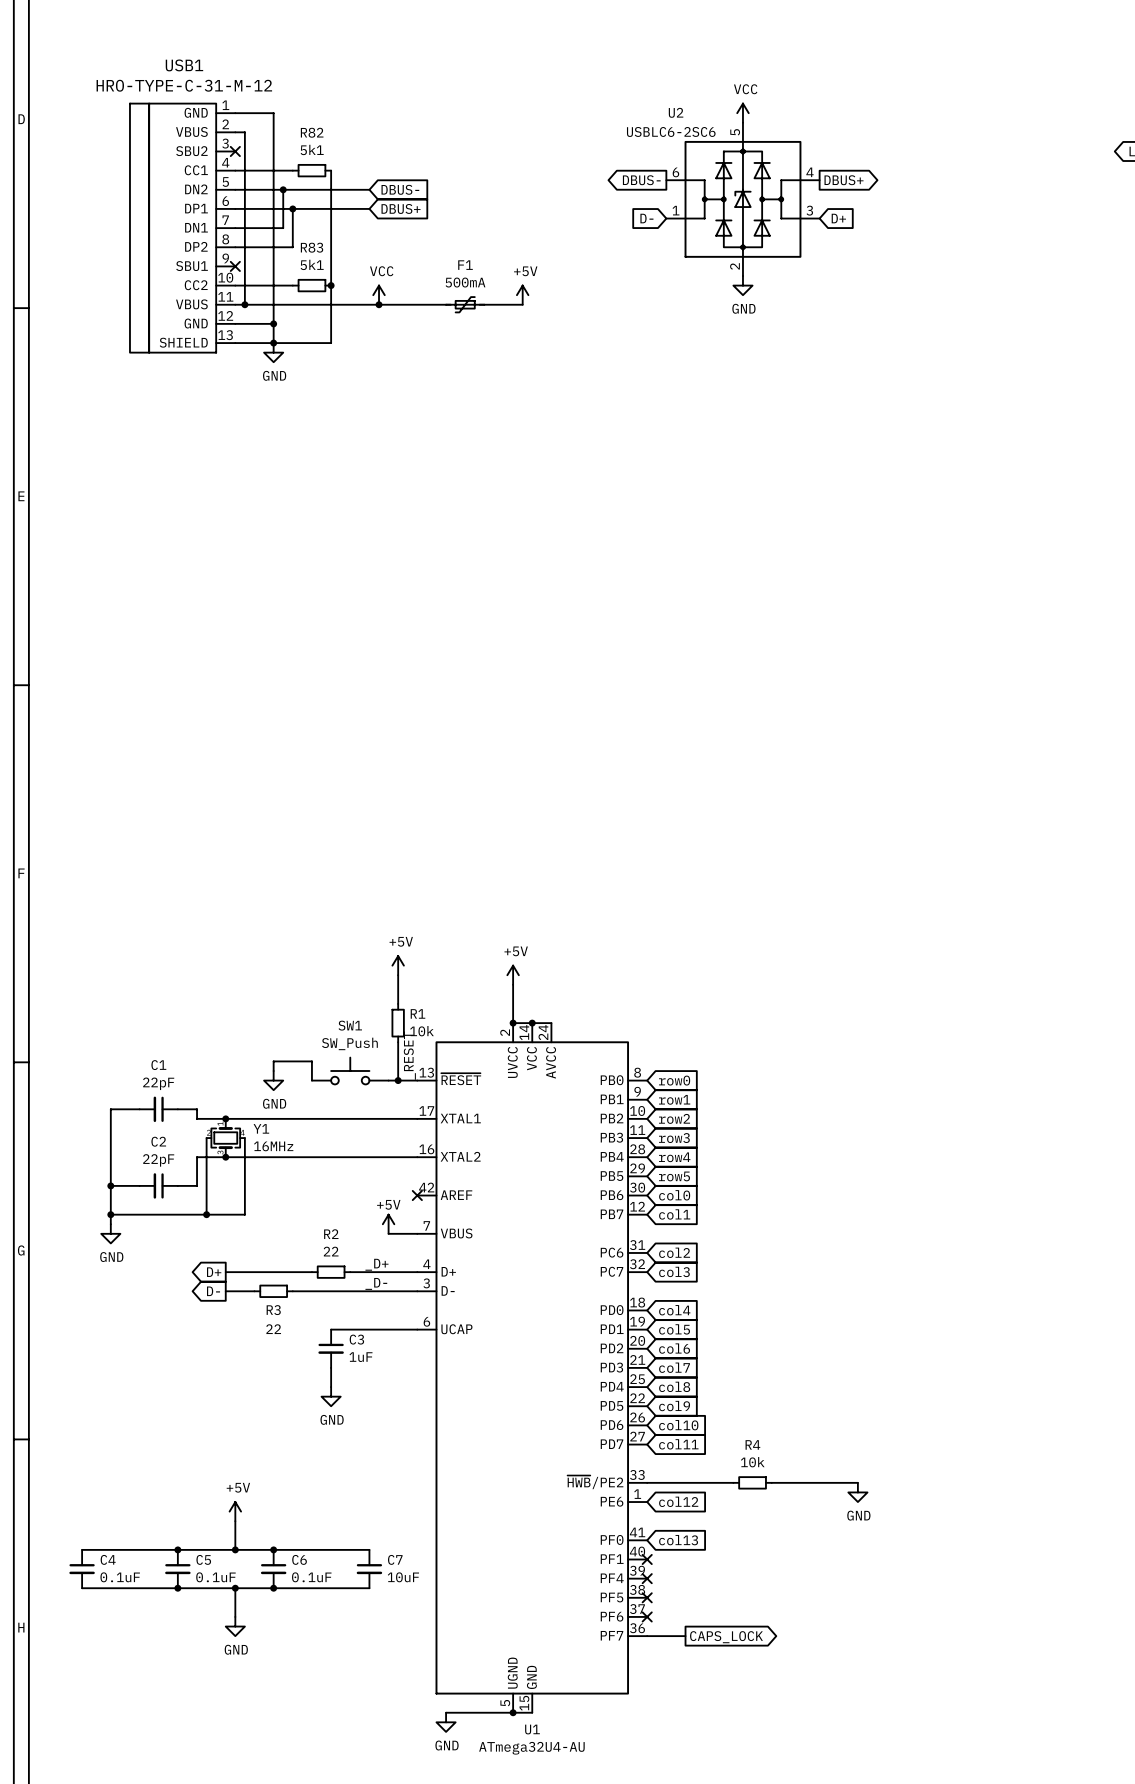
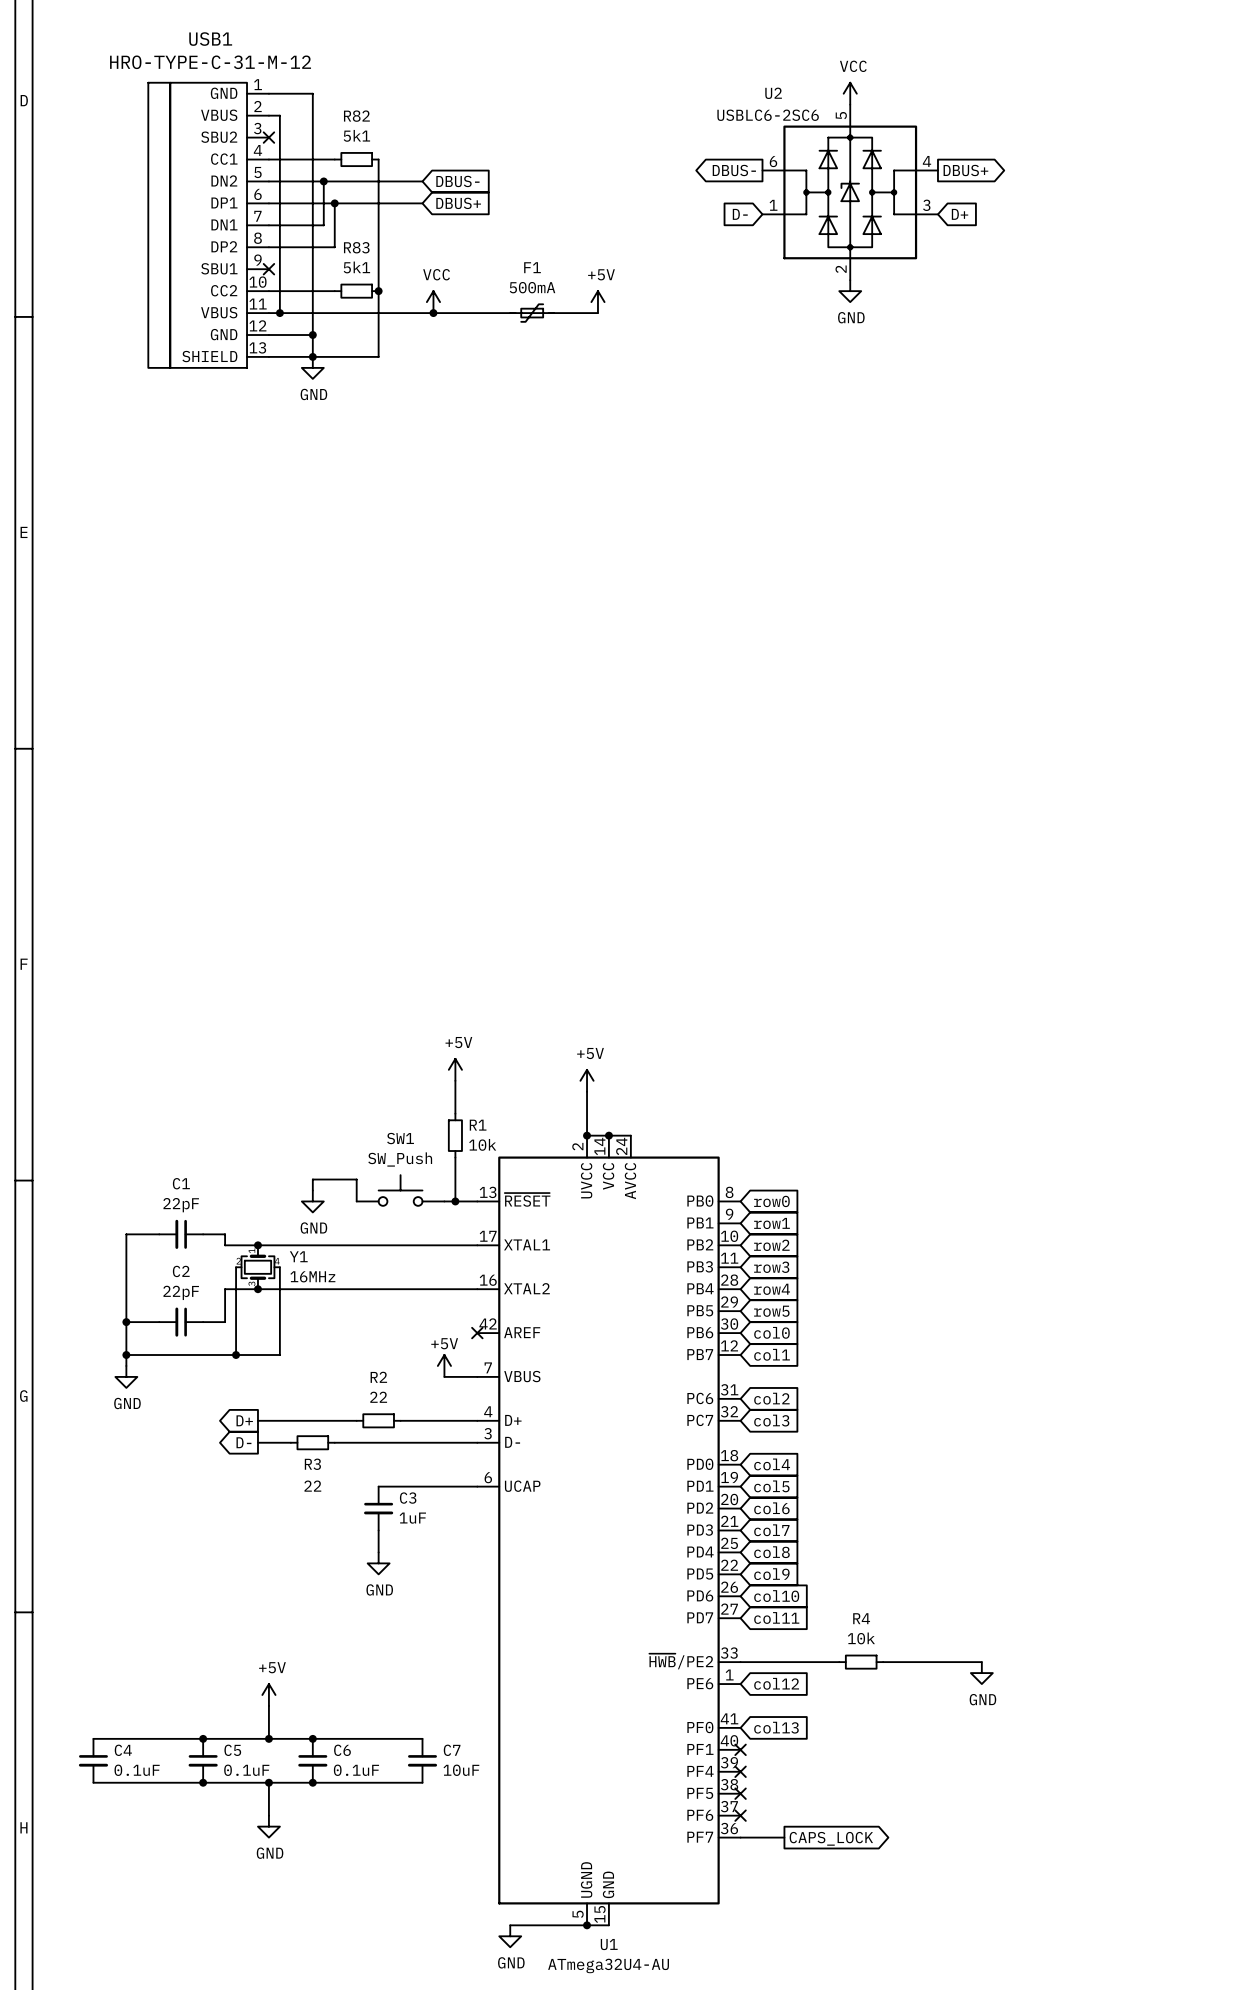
label: _RESET (409, 1055) -> none
label: _D+ (376, 1264) -> none
label: _D- (376, 1283) -> none

